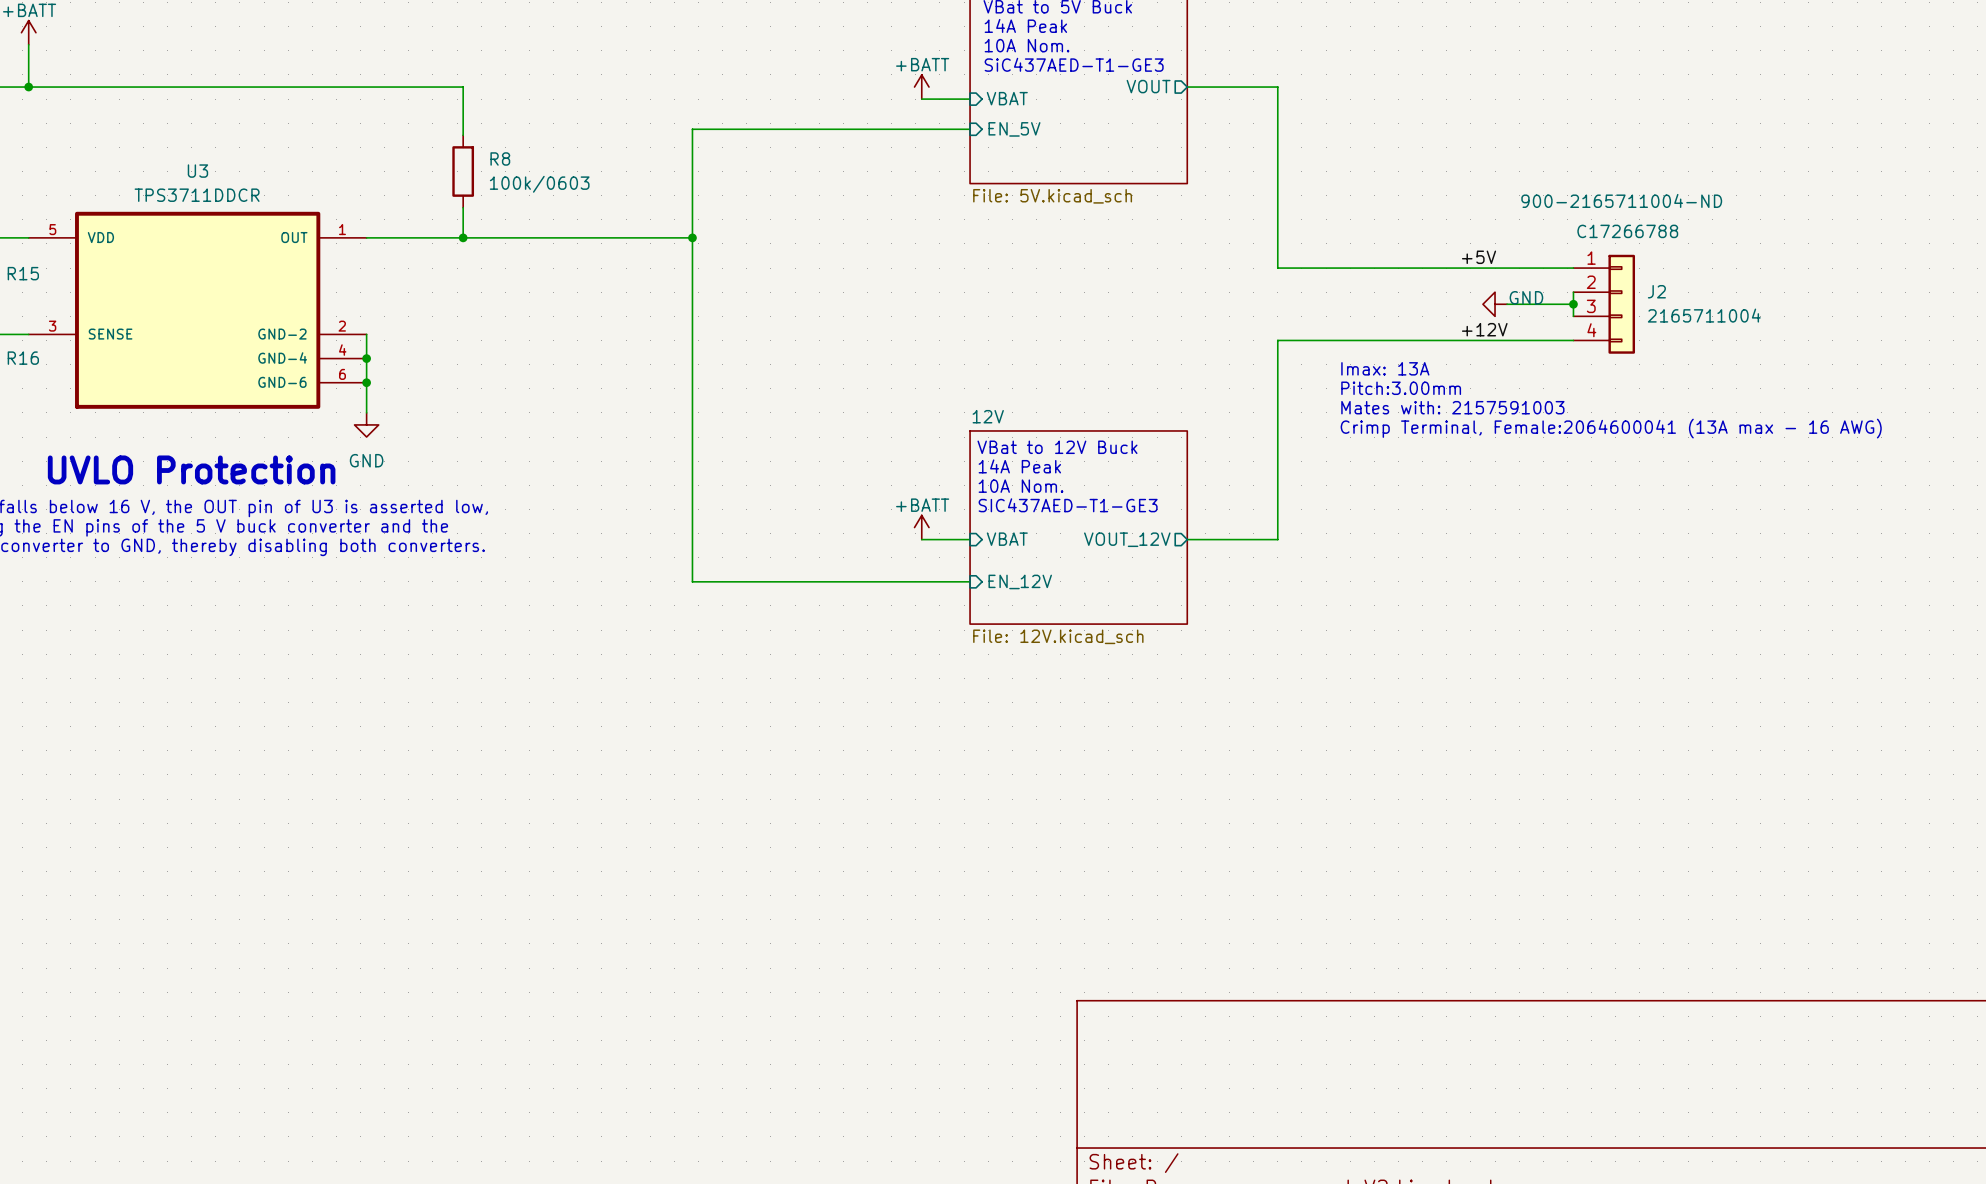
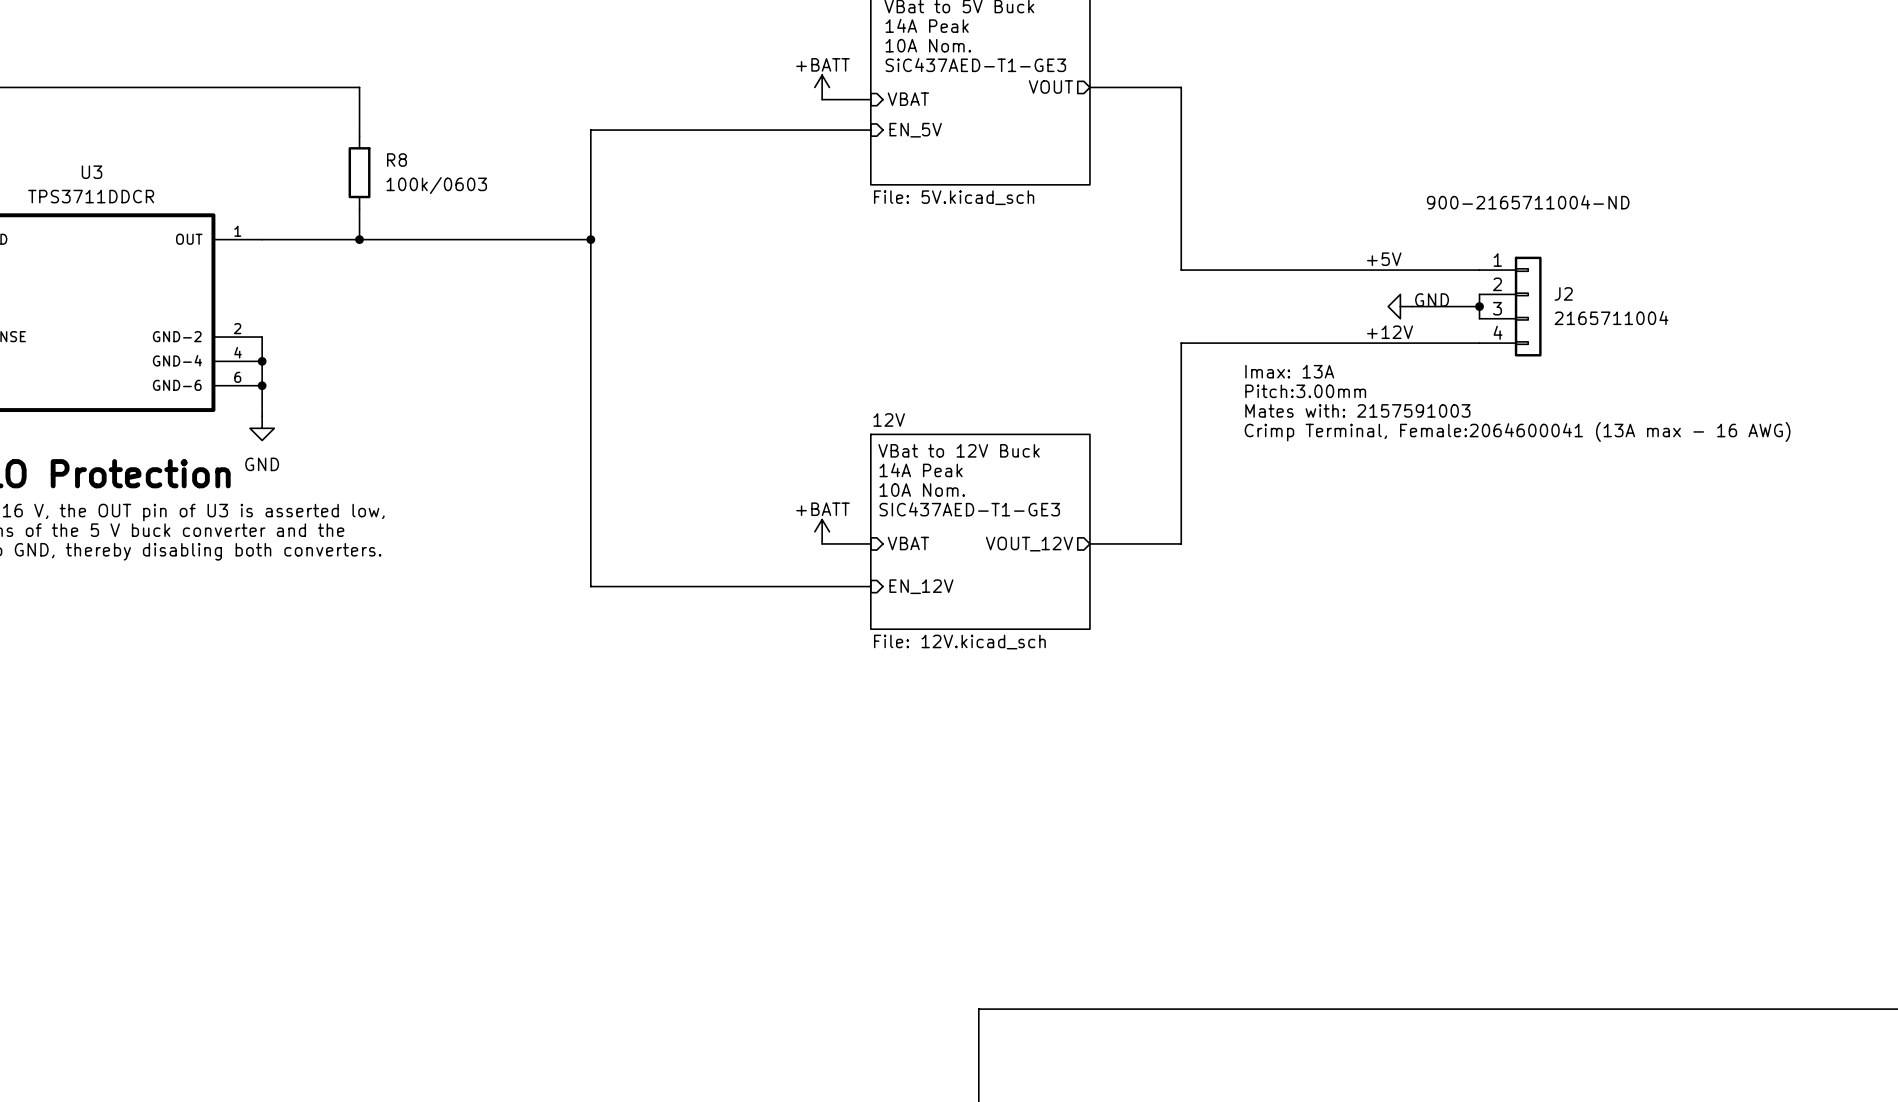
J2 text: C17266788 (1627, 231) -> none

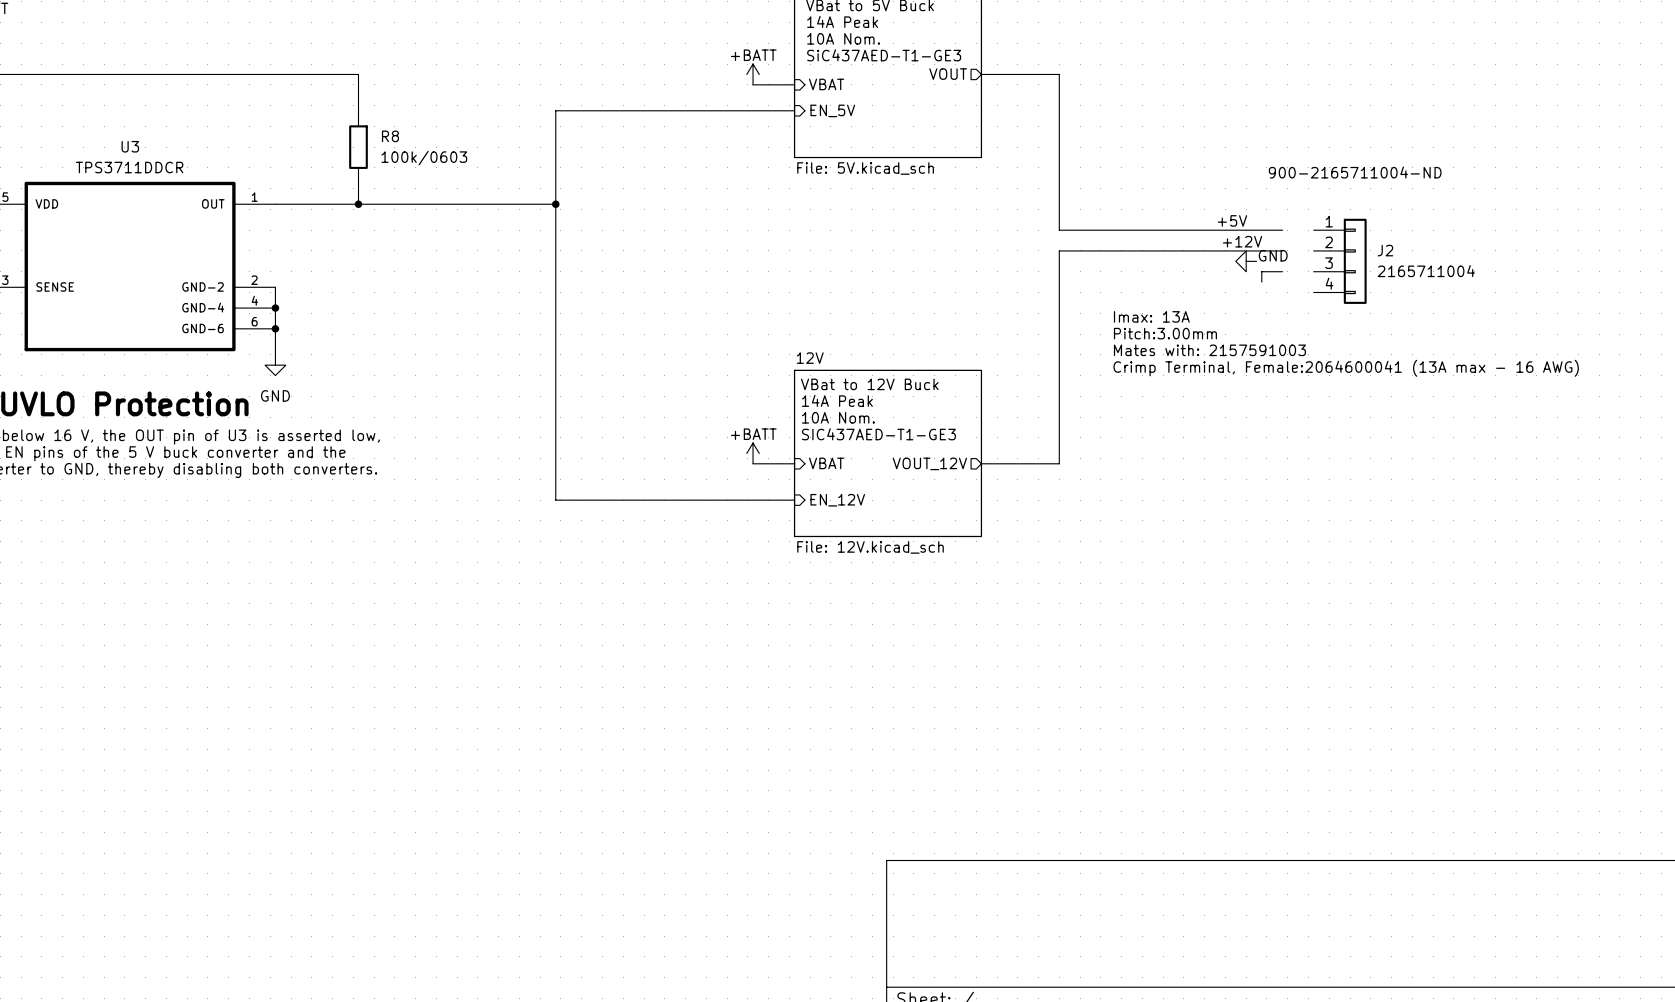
wire: (1442, 270) (1479, 270) -> none
wire: (1479, 294) (1479, 318) -> none
wire: (1412, 306) (1479, 306) -> none
junction: (1479, 306) -> none
wire: none -> (1282, 271) (1261, 271) (1261, 282)
label position: +12V (1390, 332) -> +12V (1242, 241)
wire: (1181, 343) (1479, 343) -> (1059, 292) (1059, 250) (1282, 250)

